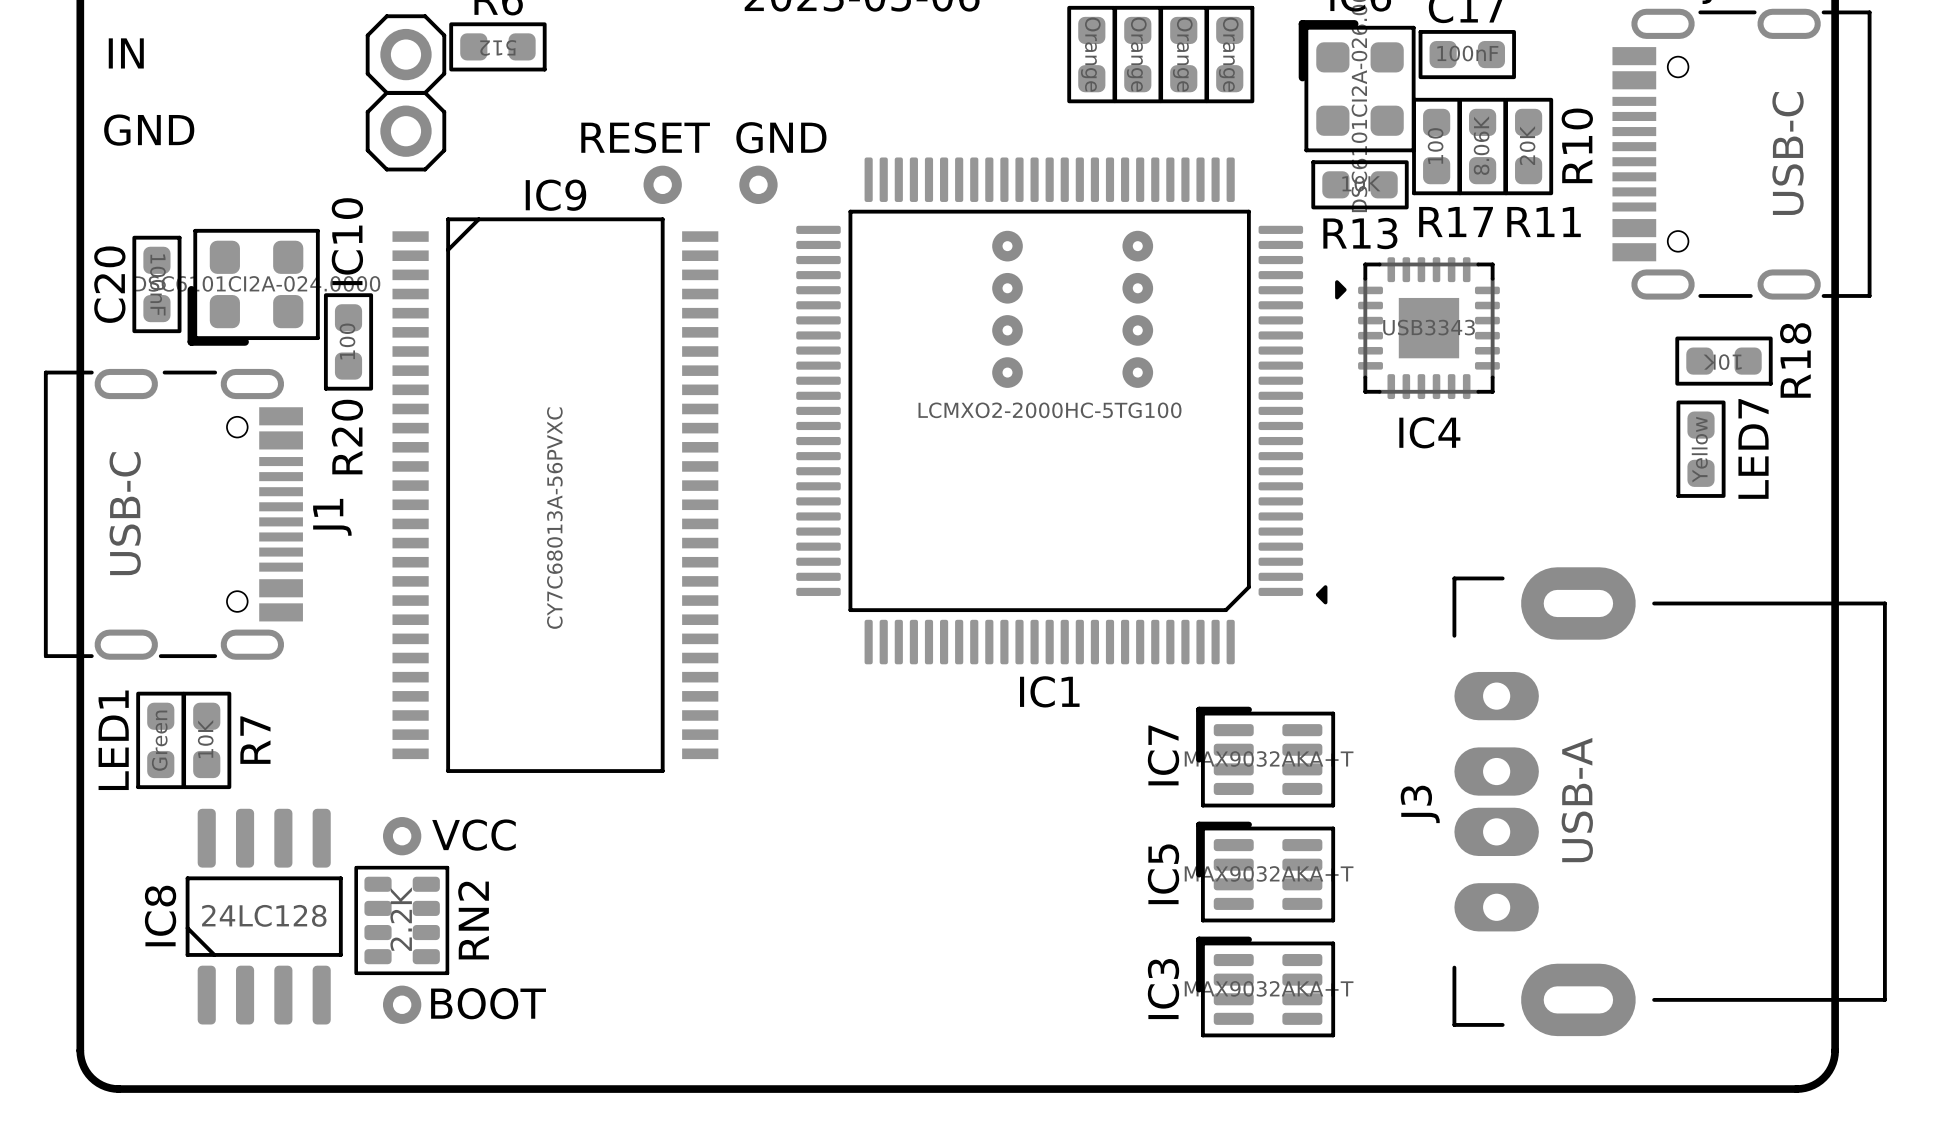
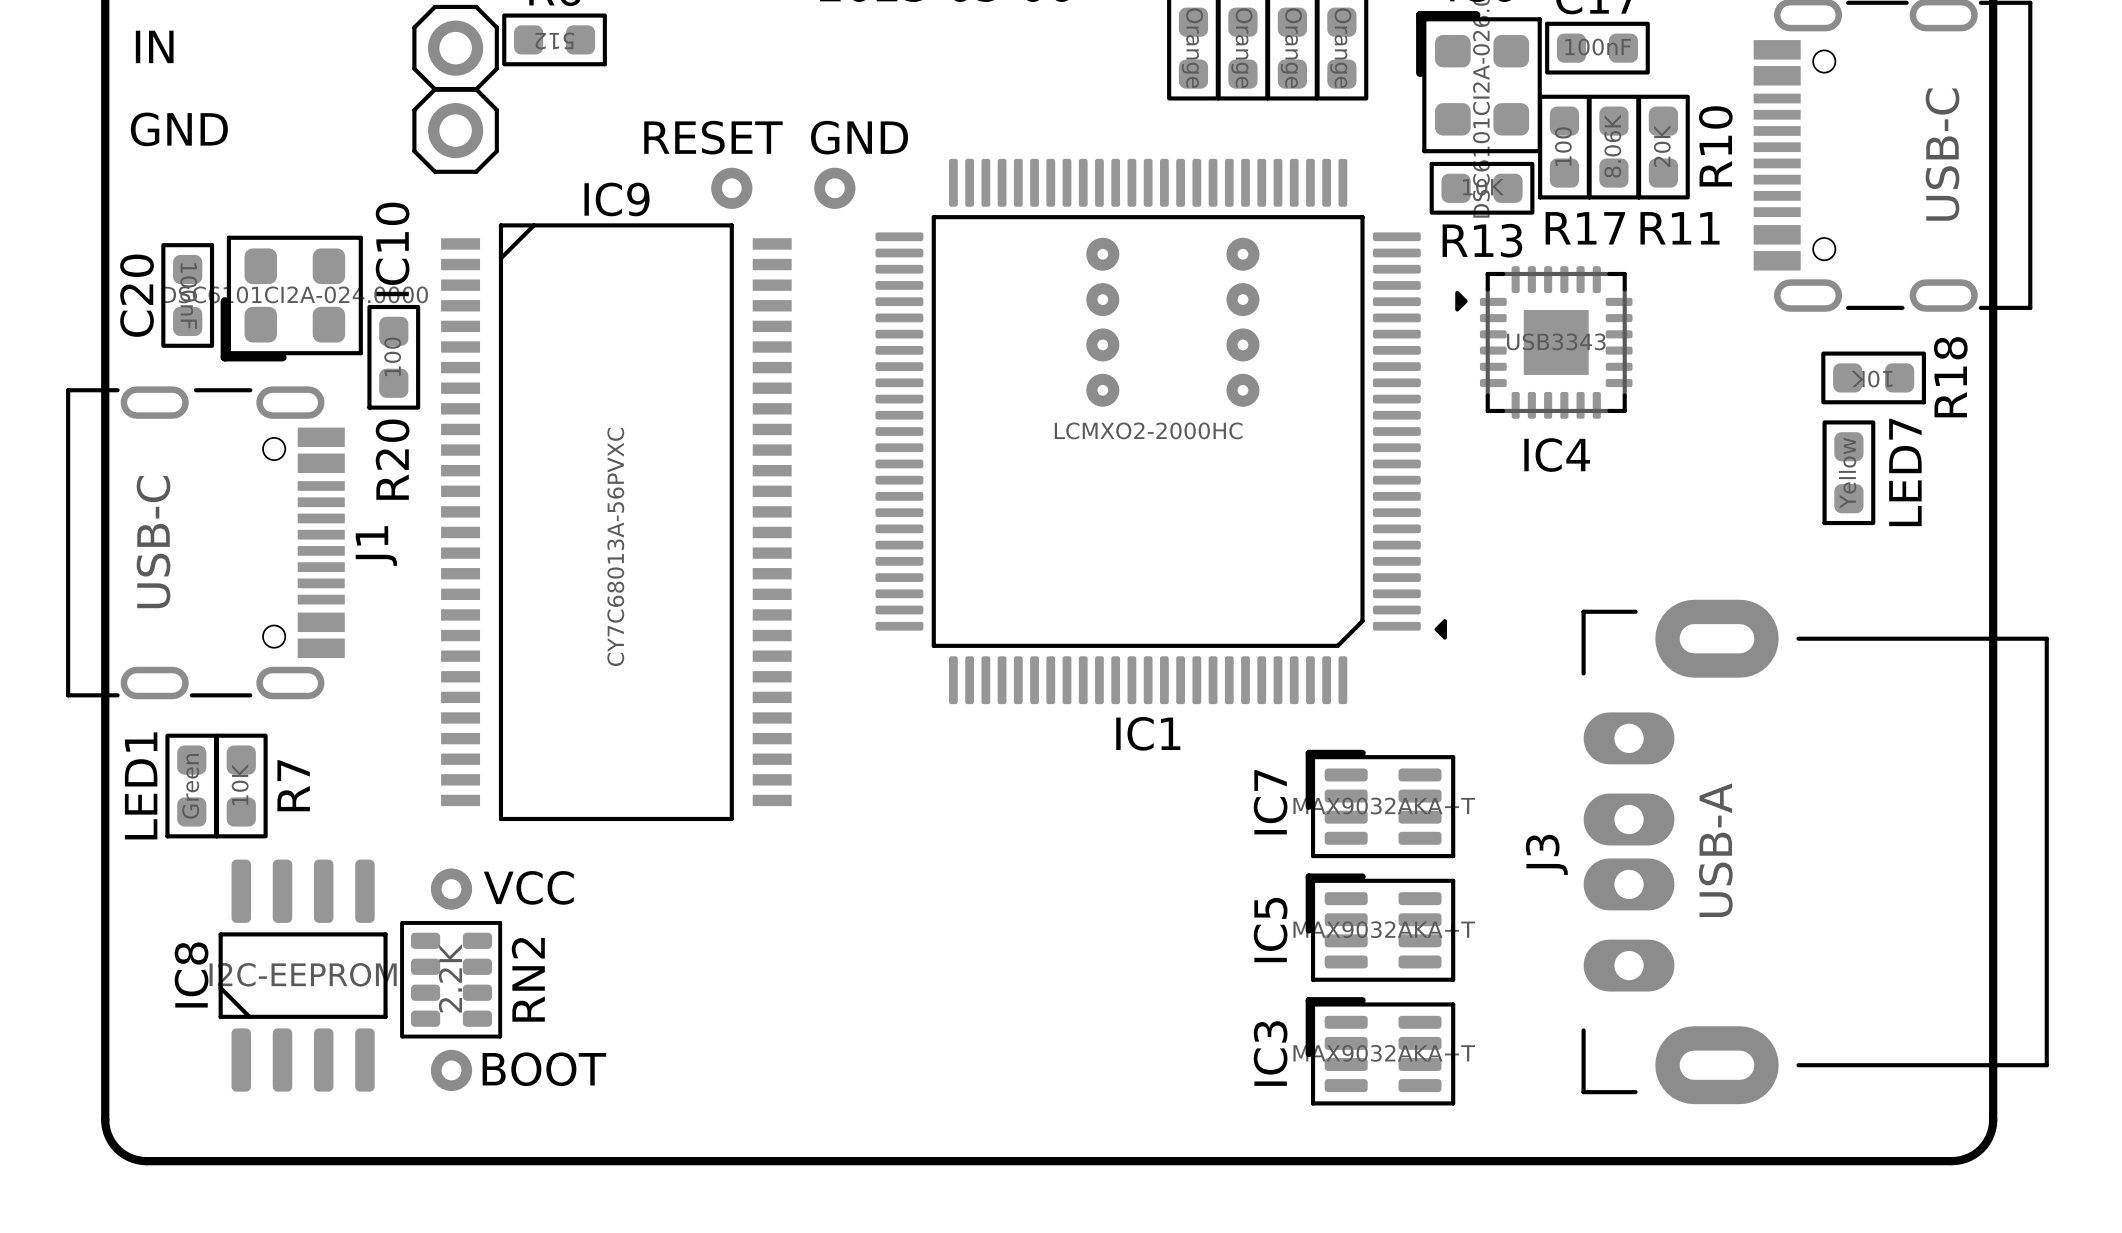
IC1 value: LCMXO2-2000HC-5TG100 (1049, 410) -> LCMXO2-2000HC (1148, 430)
IC8 value: 24LC128 (264, 915) -> I2C-EEPROM (303, 974)

